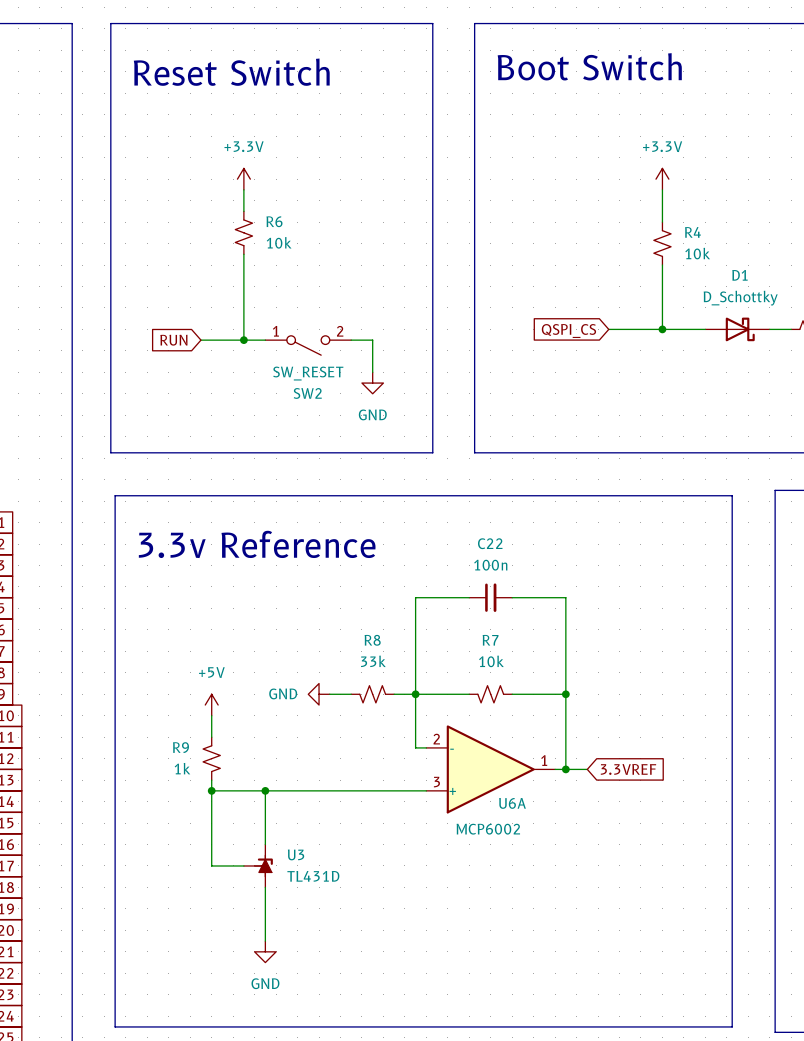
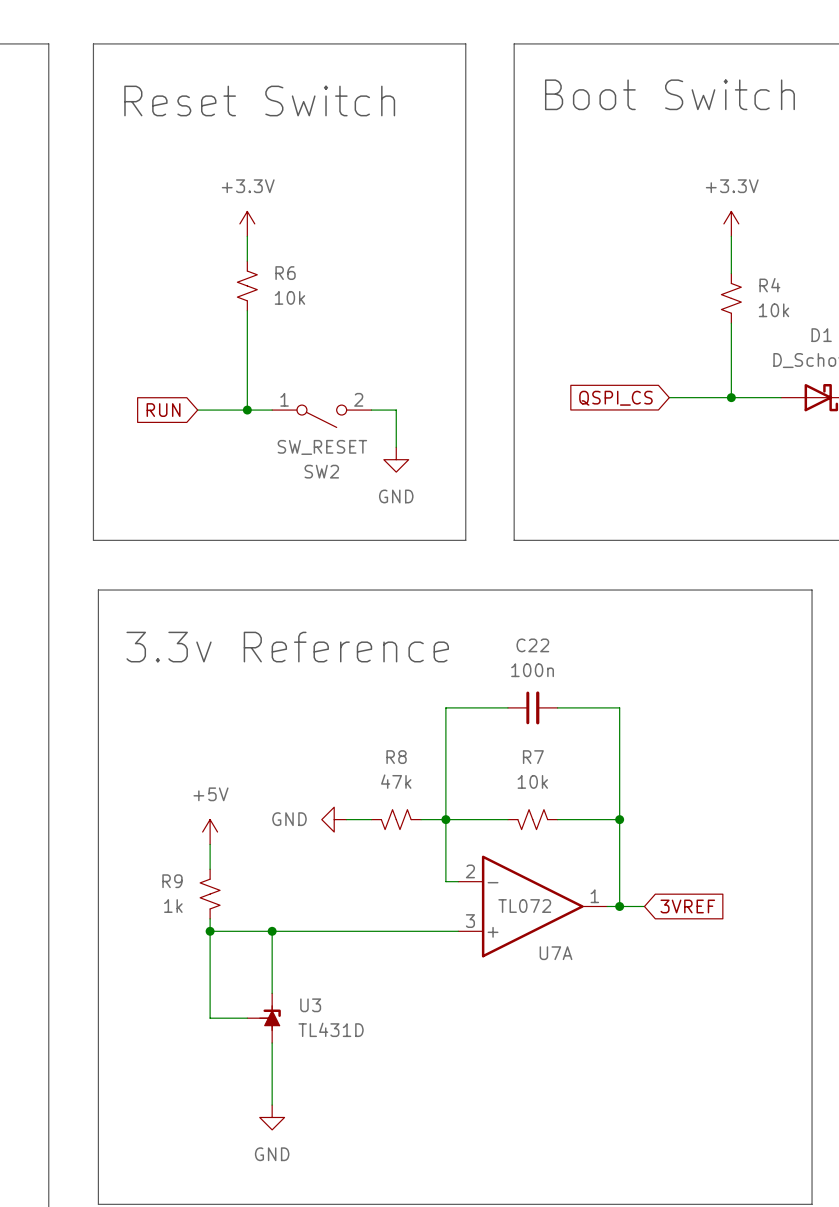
R8 value: 33k (373, 661) -> 47k (396, 781)
global label: 3.3VREF (628, 769) -> 3VREF (687, 906)
U6A name: U6A (512, 803) -> U7A (556, 953)
U6A value: MCP6002 (488, 829) -> TL072 (524, 906)

